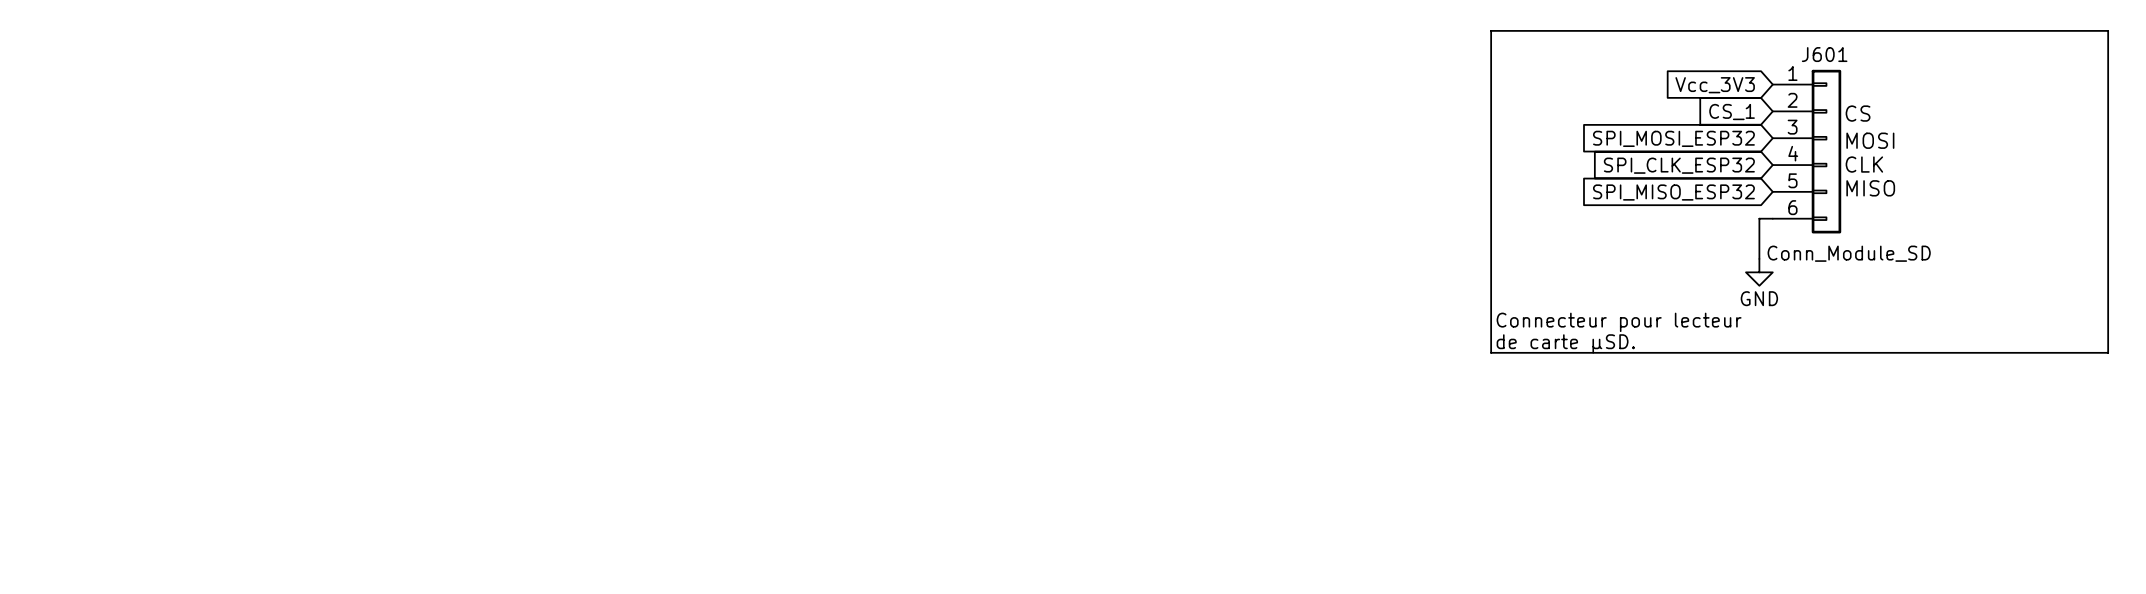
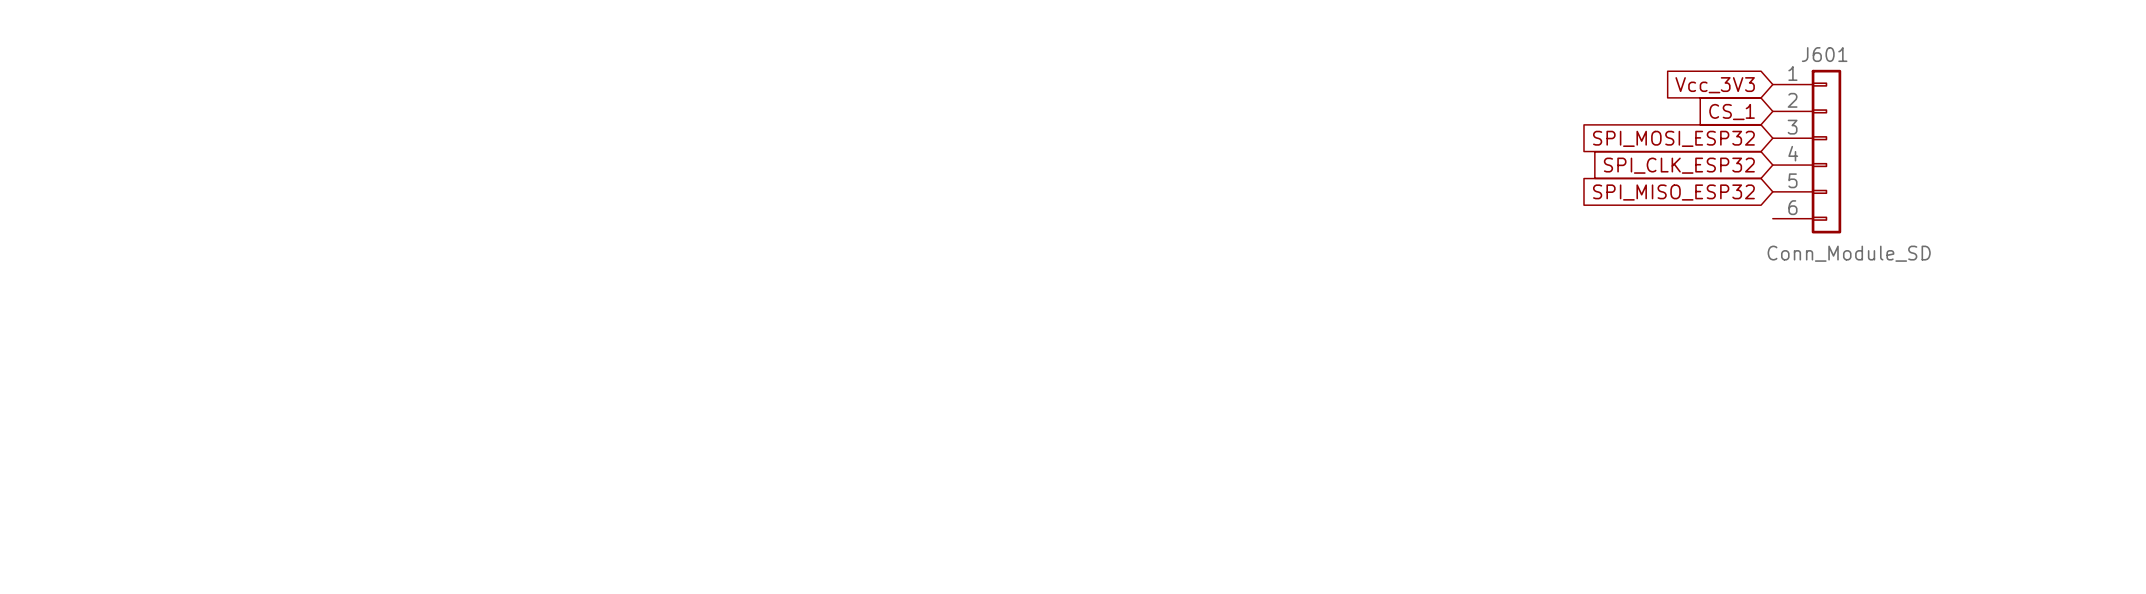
line: (1491, 30) (2108, 30) (2108, 352) (1491, 352) (1491, 30) -> none
text: CS (1858, 113) -> none
text: MOSI (1870, 140) -> none
text: CLK (1864, 164) -> none
text: MISO (1870, 188) -> none
wire: (1772, 218) (1759, 218) (1759, 258) -> none
power symbol: GND (1759, 272) -> none
text: Connecteur pour lecteur (1619, 322) -> none
text: de carte µSD. (1565, 343) -> none

